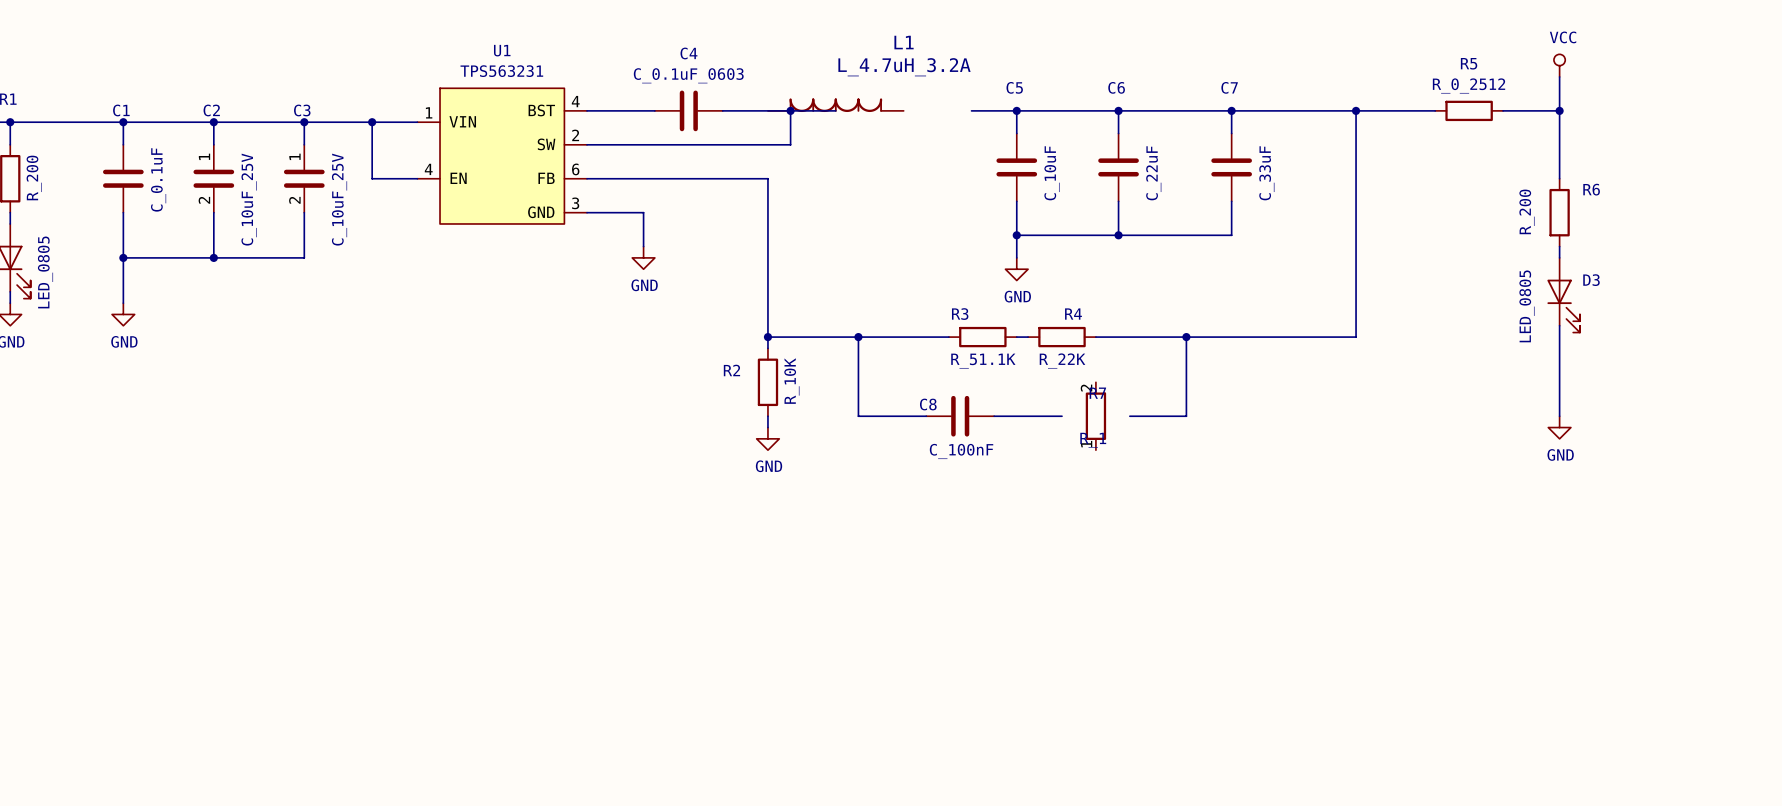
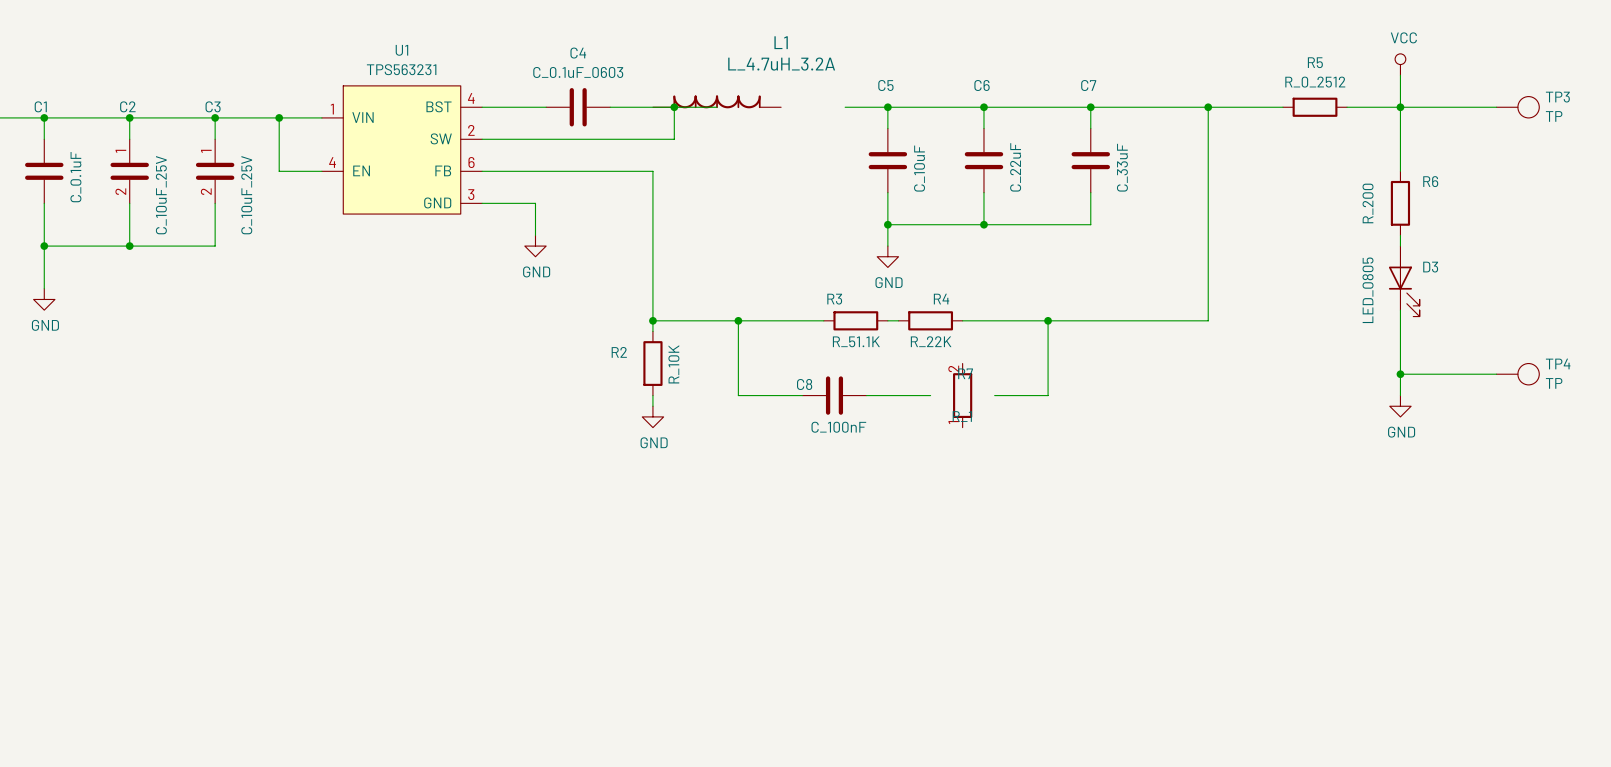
wire: none -> (1400, 107) (1496, 107)
TP3: none -> TP (1517, 107)
wire: none -> (1400, 374) (1496, 374)
junction: none -> (1400, 374)
TP4: none -> TP (1517, 374)

